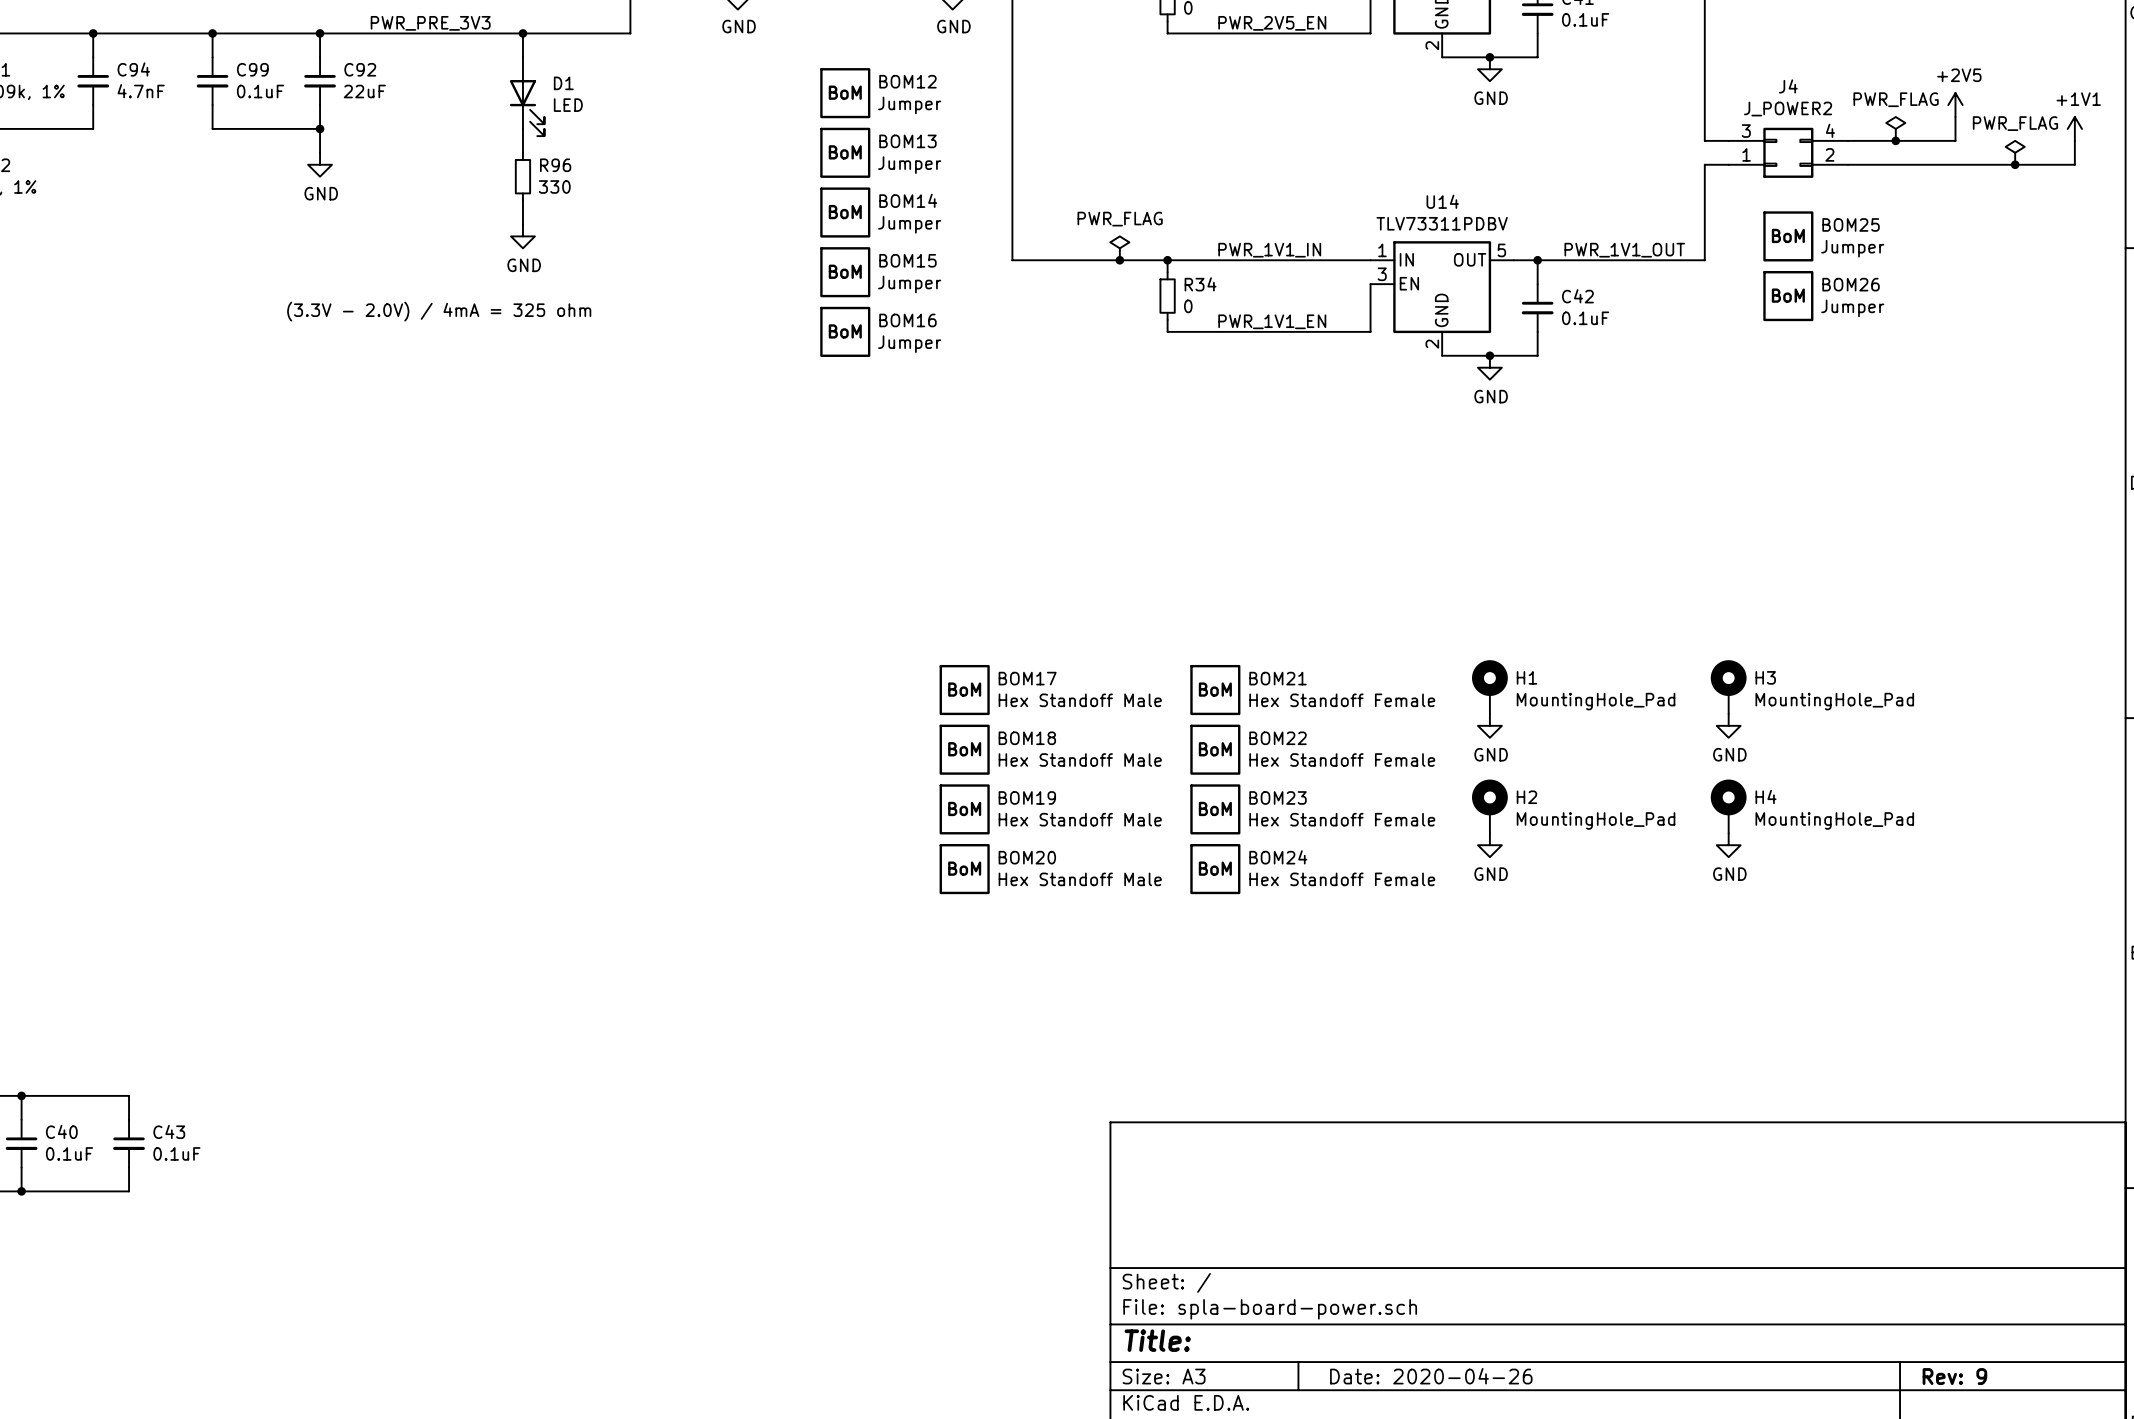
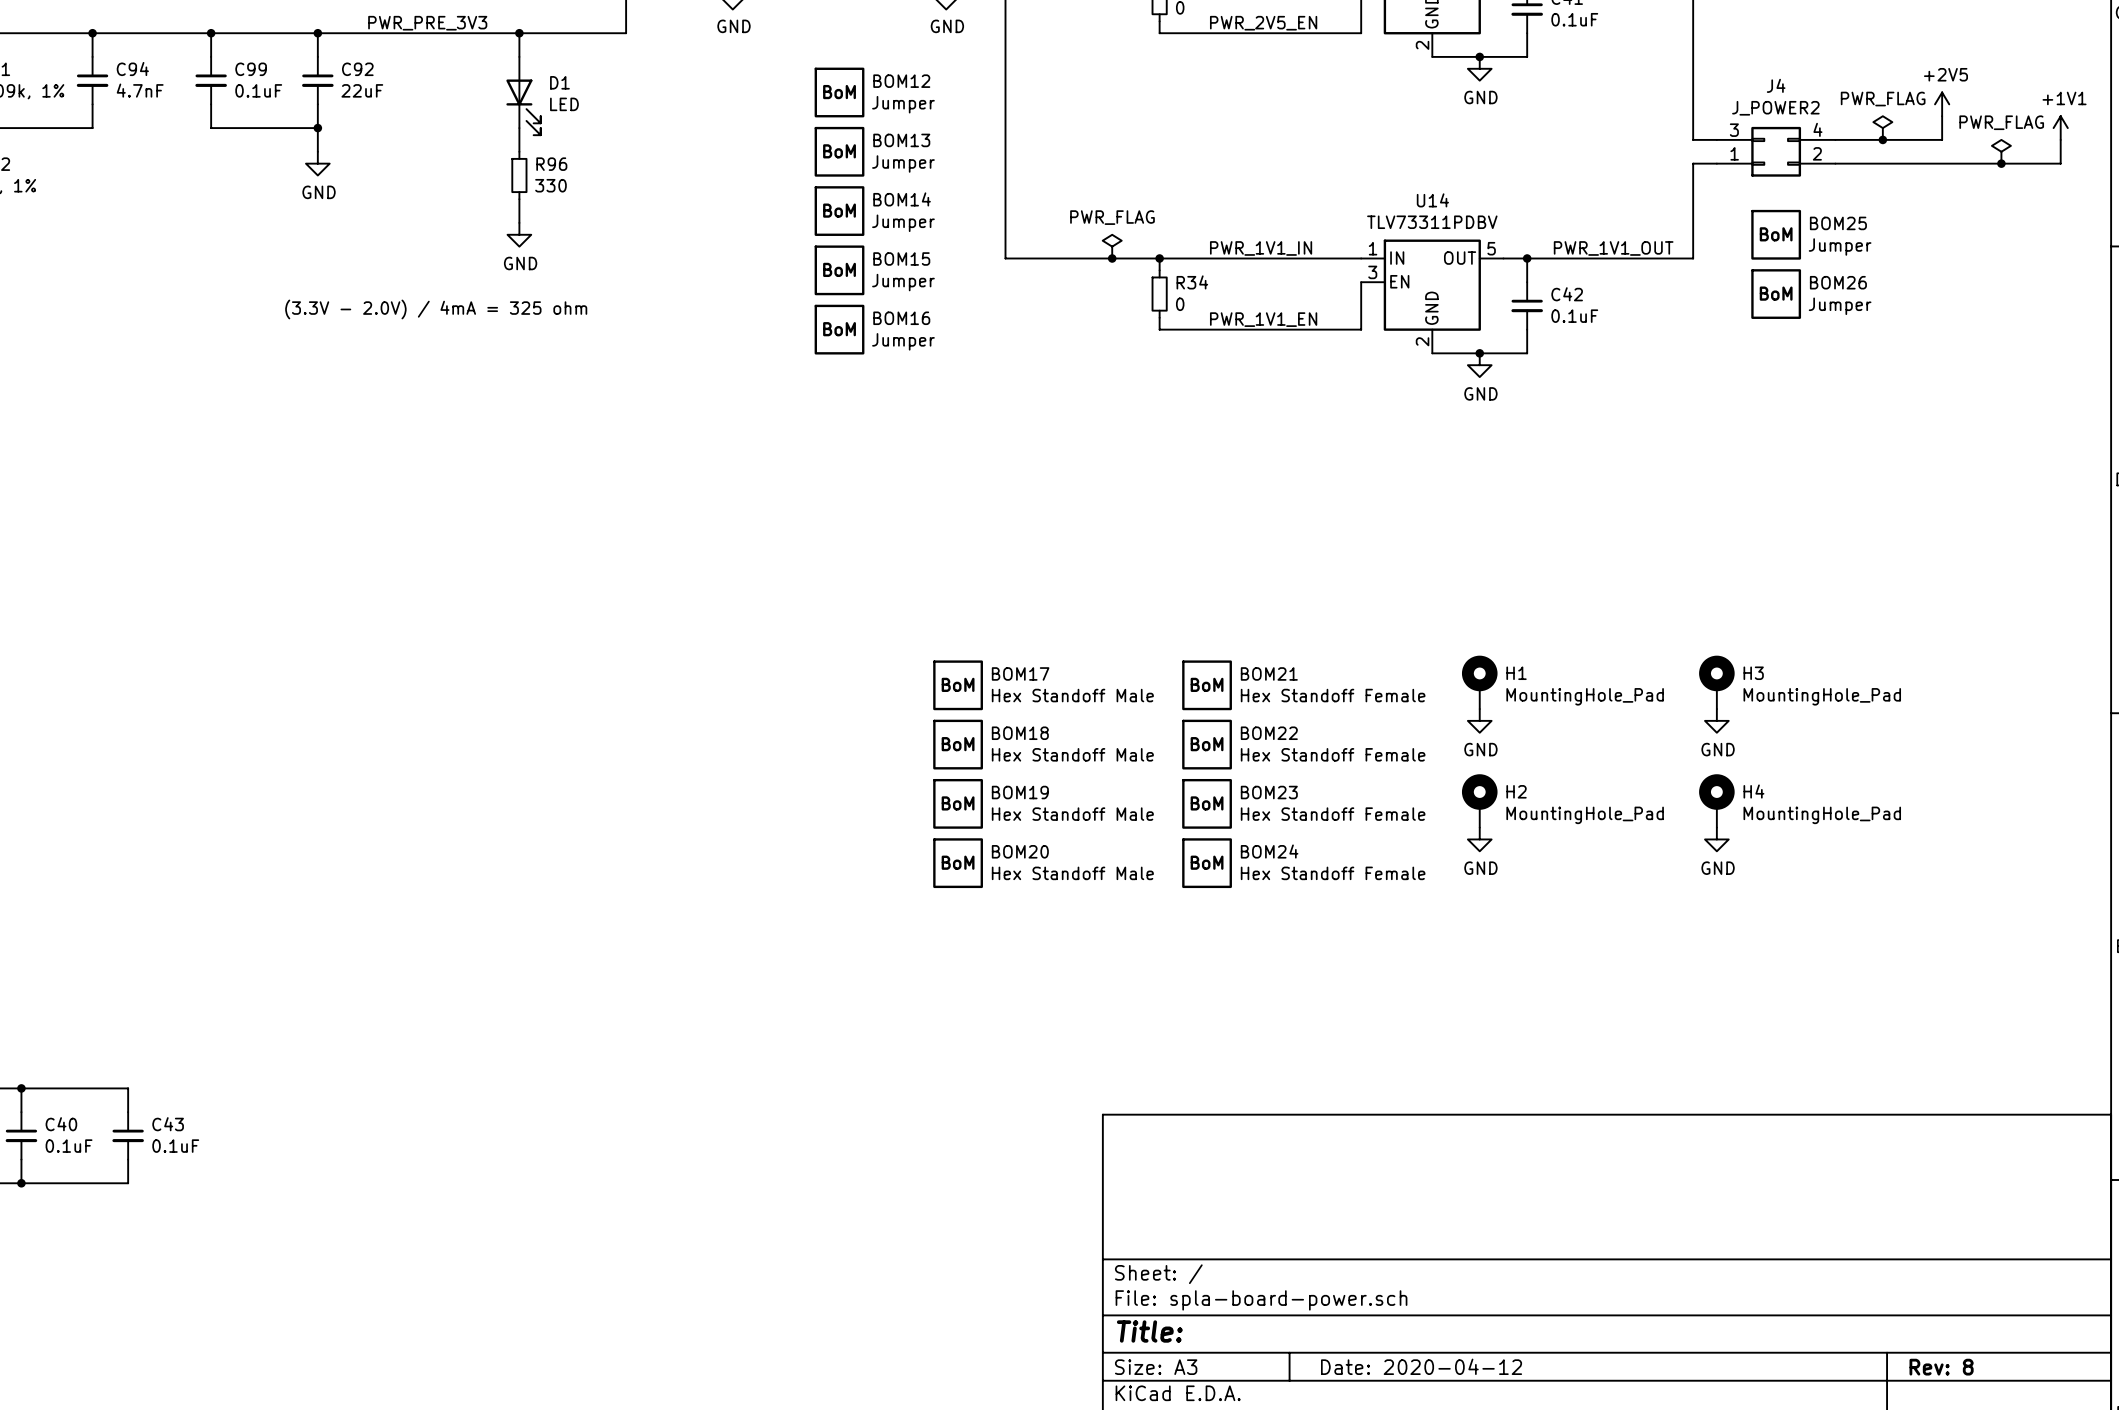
title block: Date: 2020-04-26 (1431, 1376) -> Date: 2020-04-12 (1421, 1366)
title block: Rev: 9 (1954, 1376) -> Rev: 8 (1941, 1367)

